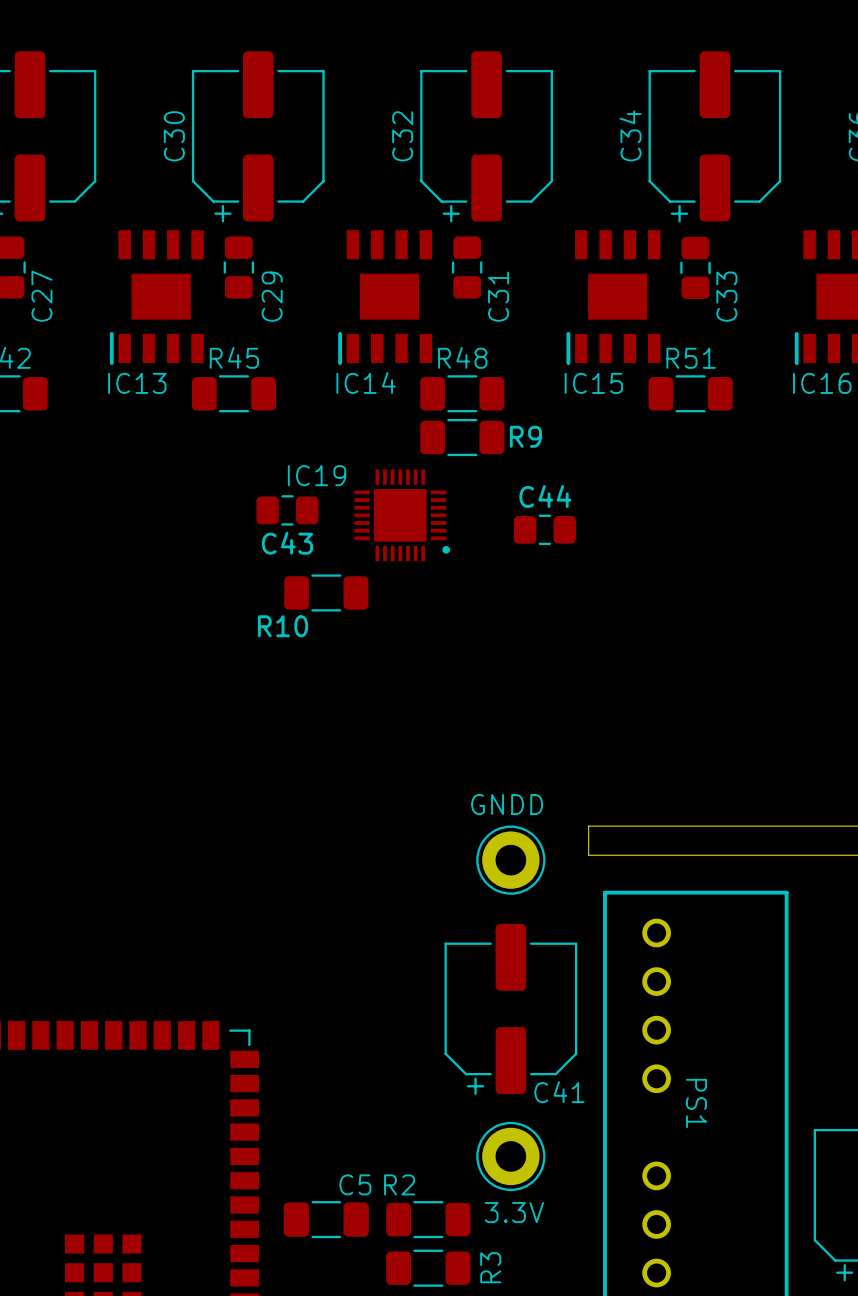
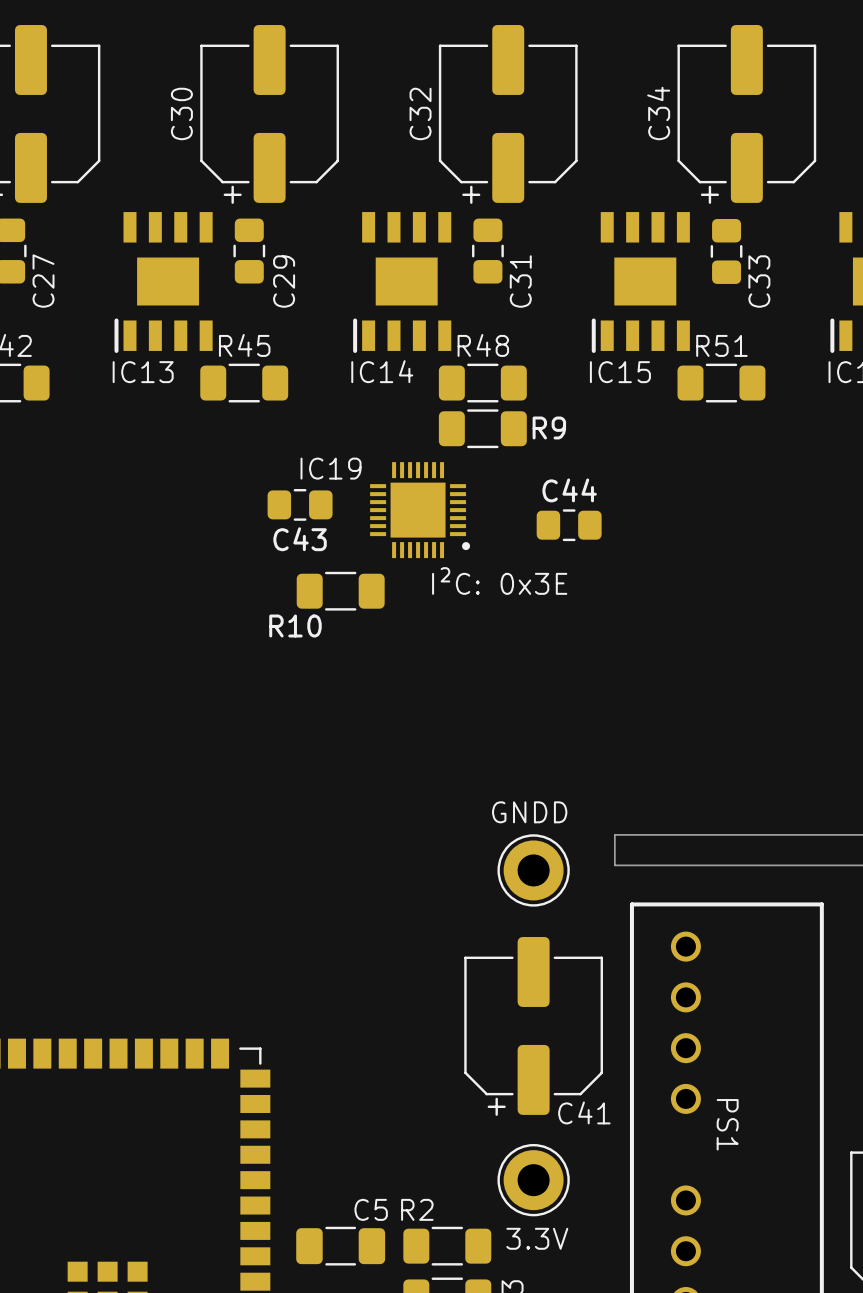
text: none -> I²C: 0x3E (499, 580)

